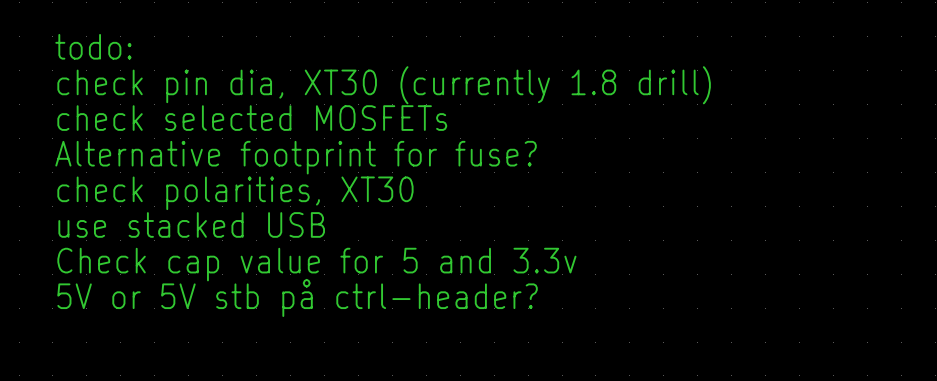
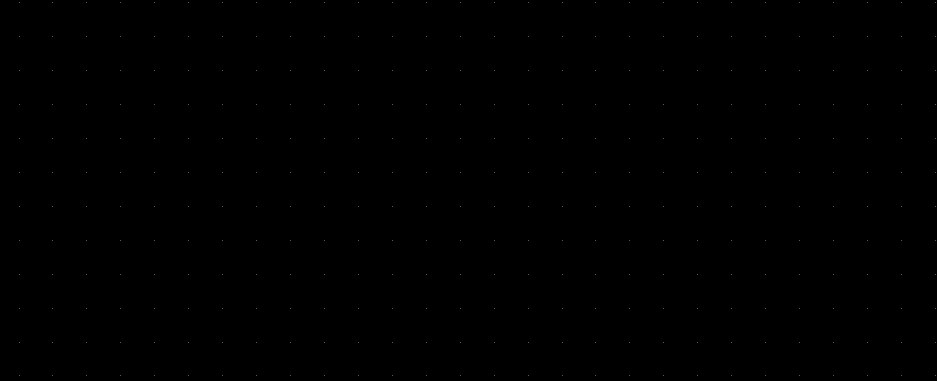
text: todo: (93, 46) -> none
text: check pin dia, XT30 (currently 1.8 drill) (384, 85) -> none
text: check selected MOSFETs (252, 118) -> none
text: Alternative footprint for fuse? (296, 157) -> none
text: check polarities, XT30 (235, 193) -> none
text: use stacked USB (191, 224) -> none
text: Check cap value for 5 and 3.3v (316, 264) -> none
text: 5V or 5V stb på ctrl-header? (297, 297) -> none

